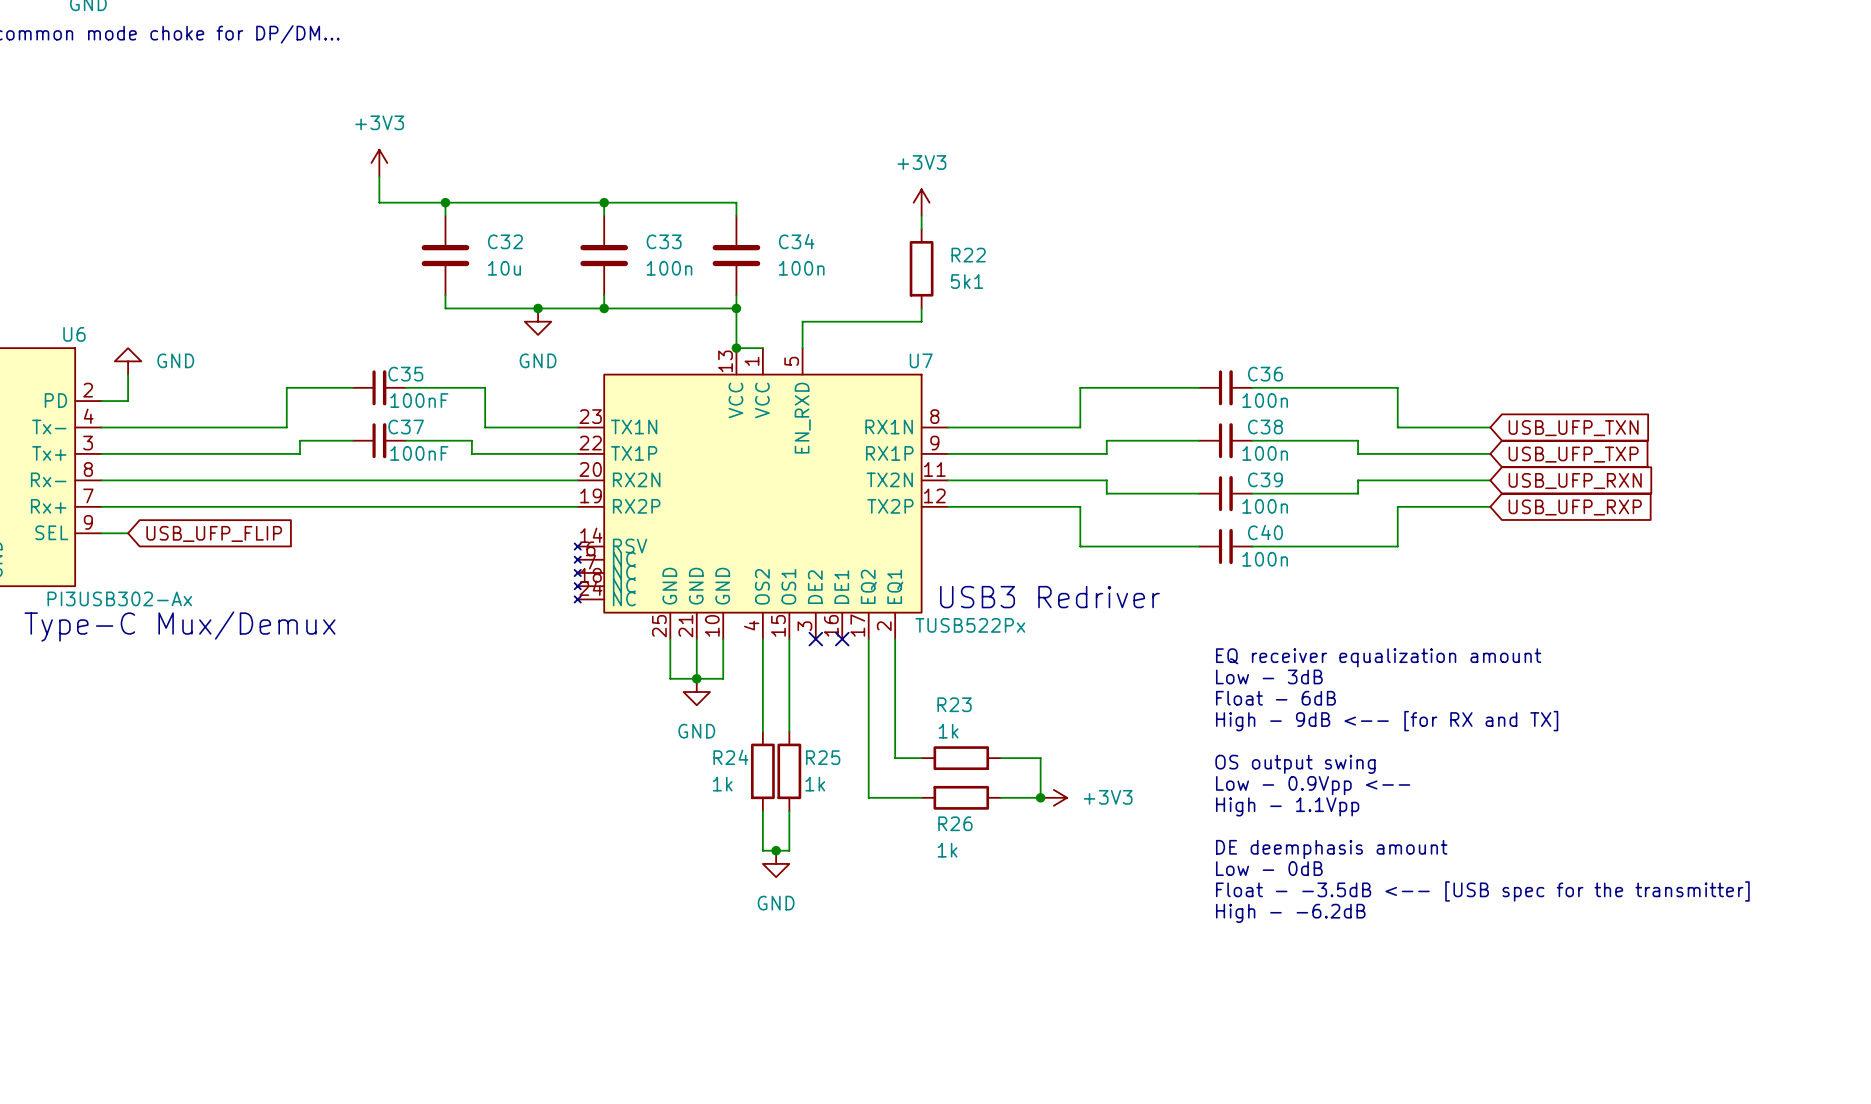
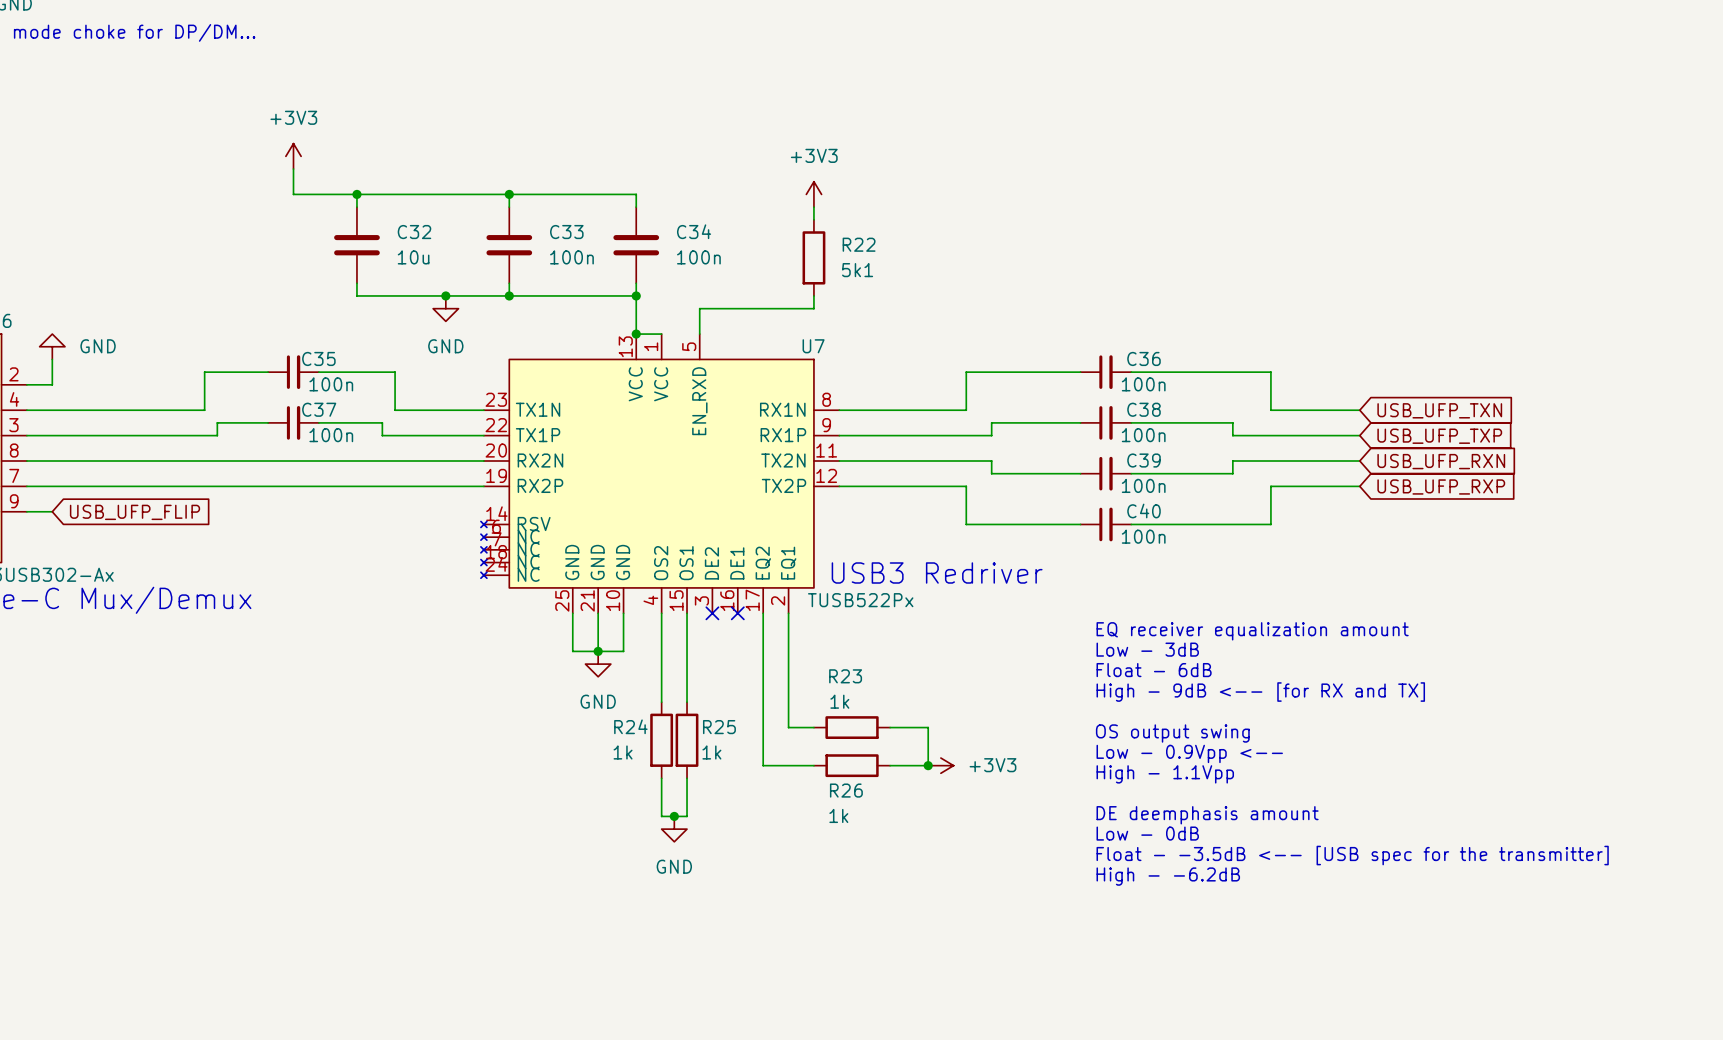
C35 value: 100nF (419, 400) -> 100n (331, 384)
C37 value: 100nF (419, 453) -> 100n (331, 435)

